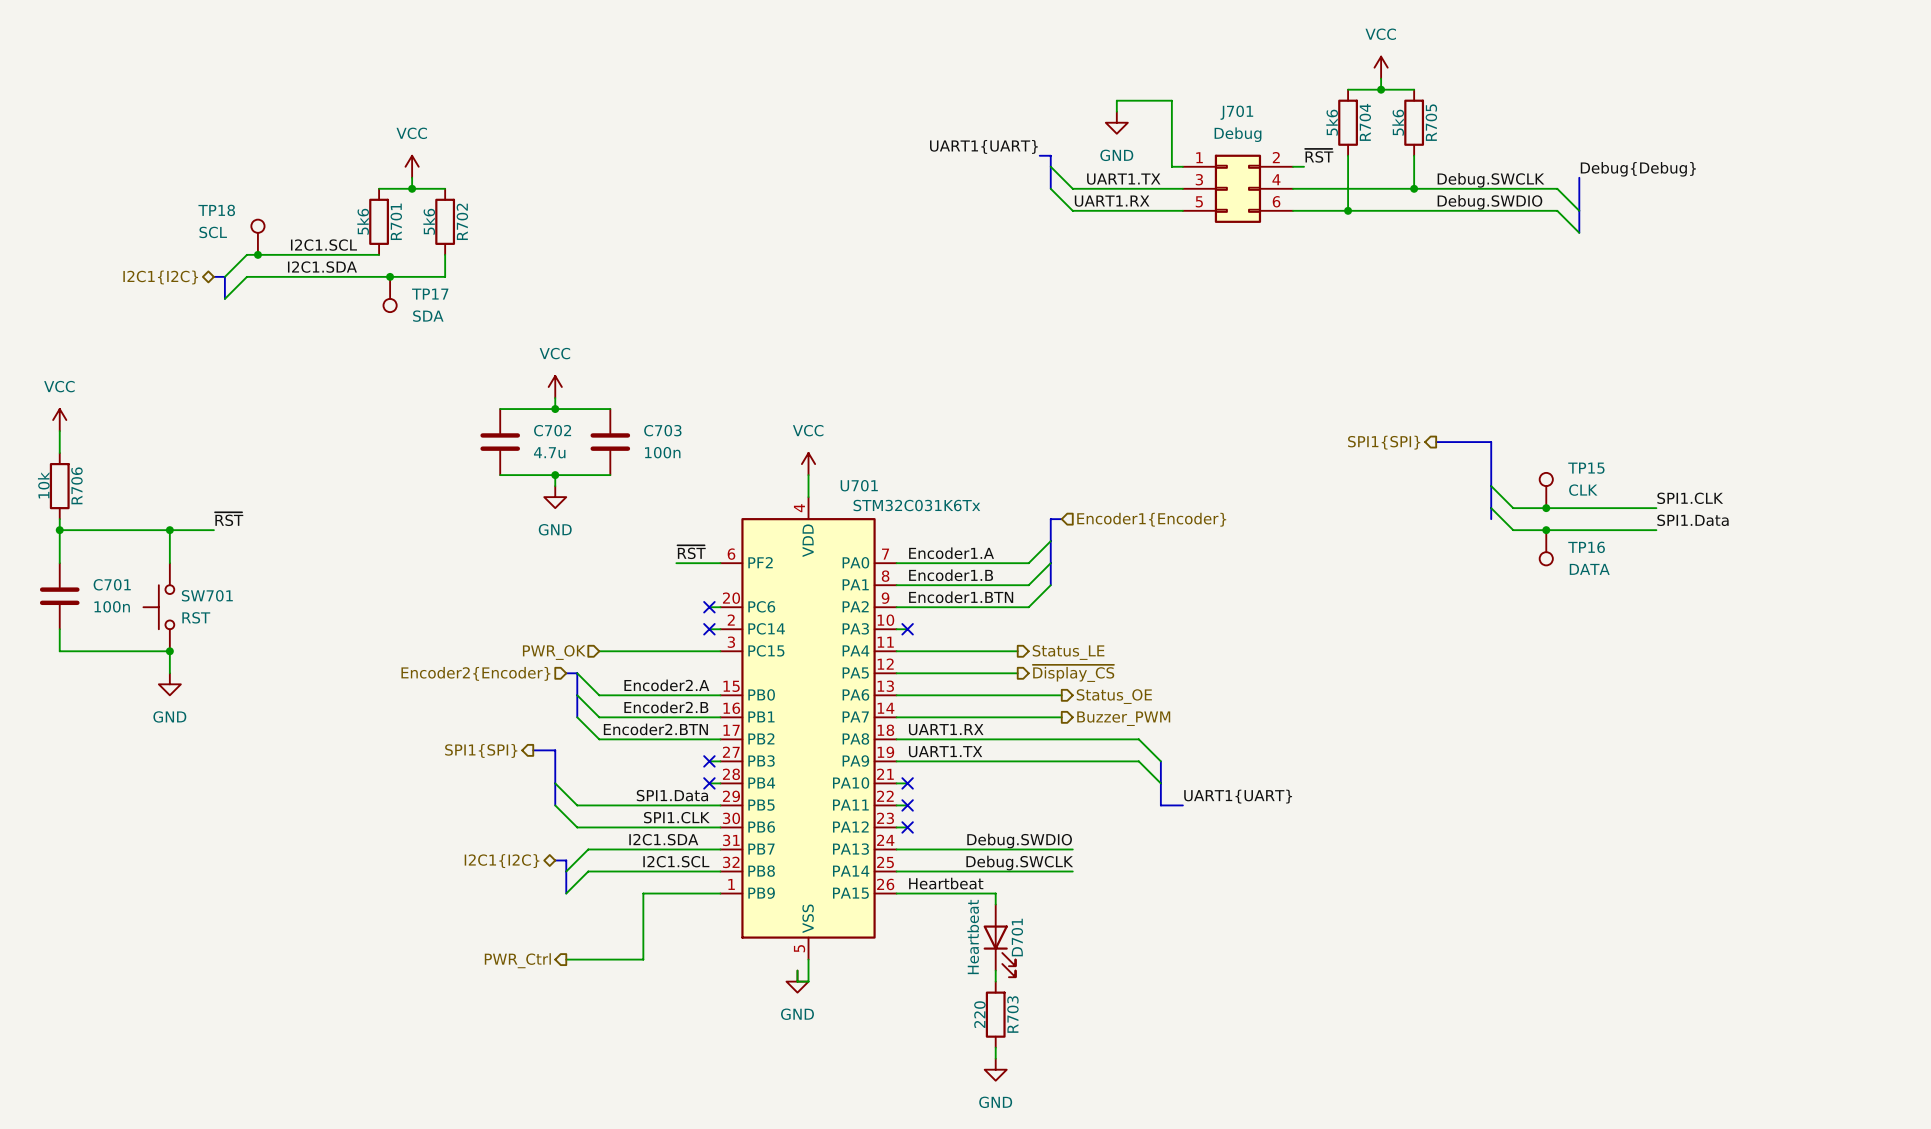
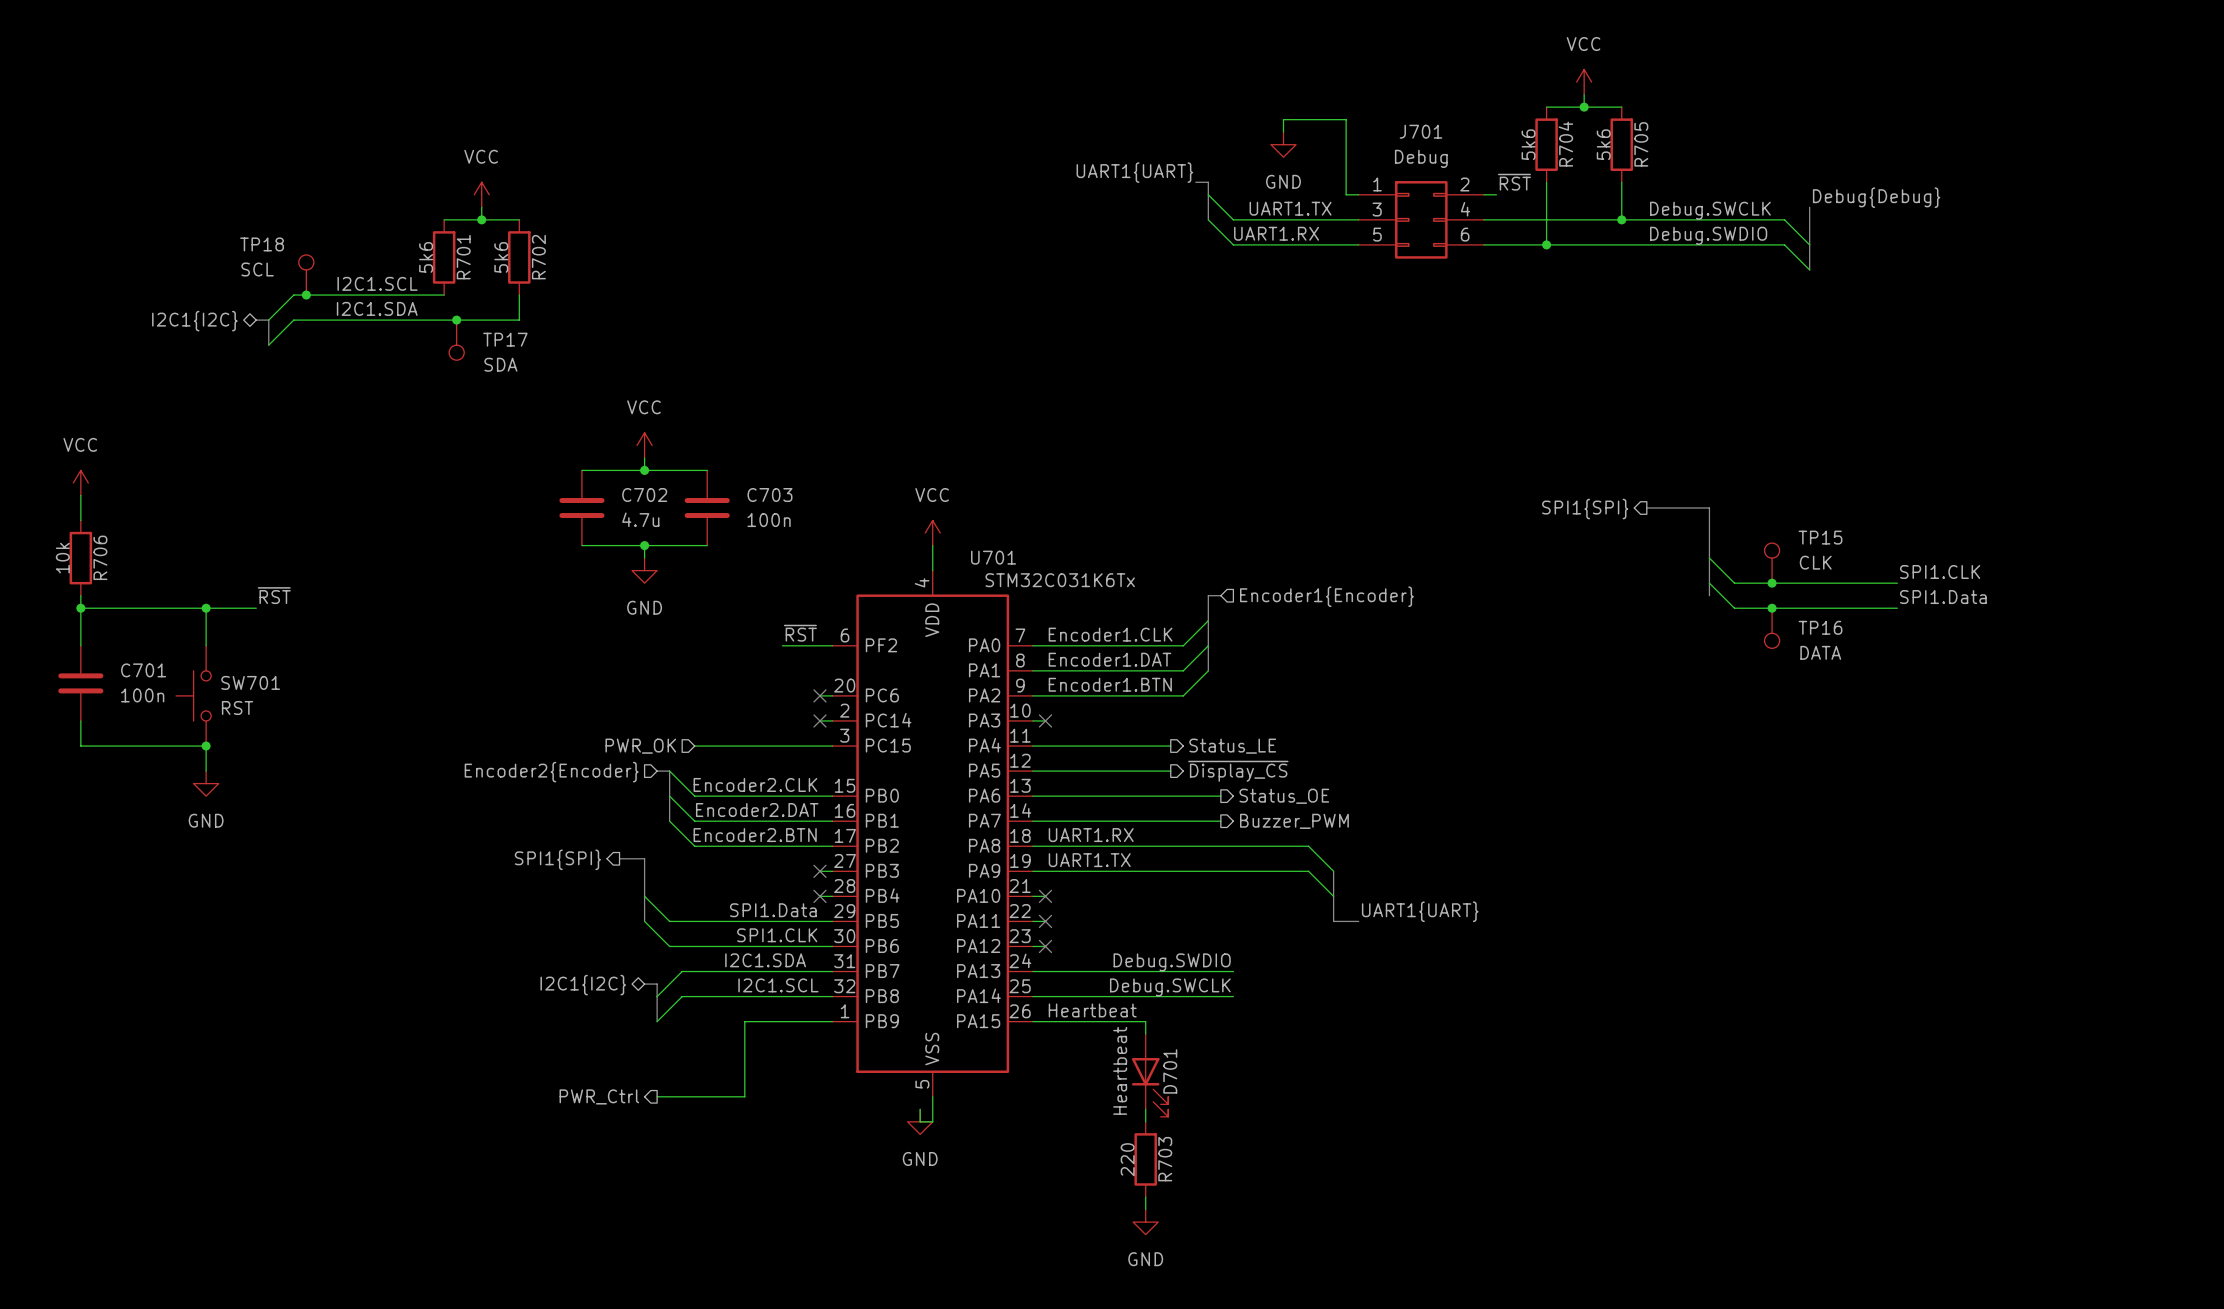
label: Encoder1.A (951, 553) -> Encoder1.CLK (1110, 634)
label: Encoder1.B (951, 575) -> Encoder1.DAT (1109, 659)
label: Encoder2.A (666, 685) -> Encoder2.CLK (755, 784)
label: Encoder2.B (666, 707) -> Encoder2.DAT (757, 810)

